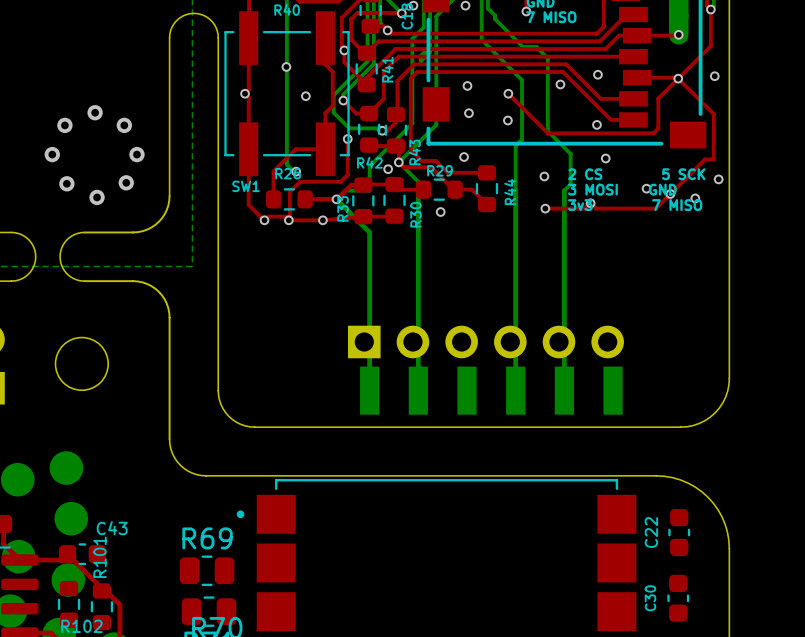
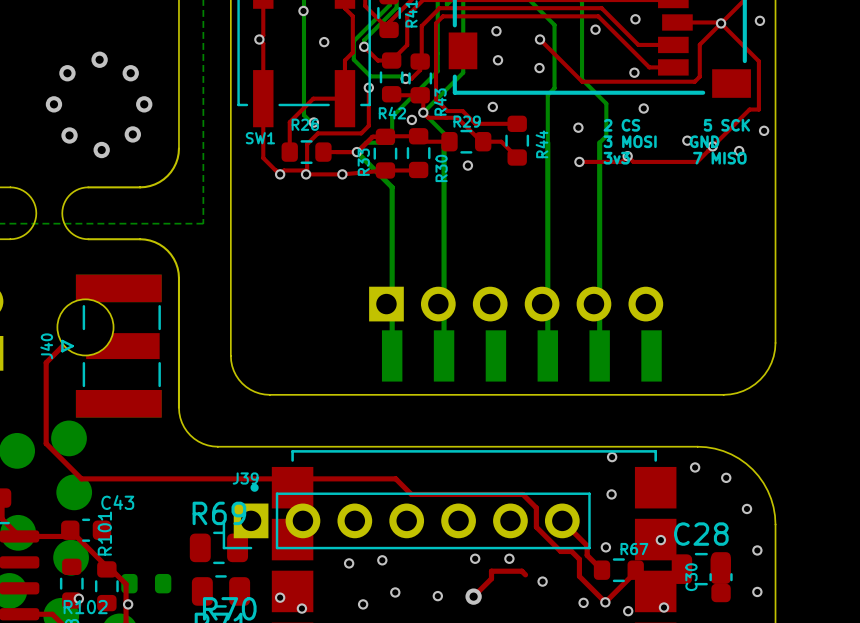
J40: none -> (111, 346)
top track: none -> (122, 346) (62, 346) (46, 362) (46, 443) (81, 478) (395, 478) (411, 494) (522, 494) (536, 507) (536, 527) (560, 551) (571, 551) (579, 559) (579, 576) (605, 602) (635, 570)
via: none -> (612, 457)
via: none -> (695, 467)
via: none -> (726, 477)
via: none -> (611, 494)
C22: (679, 532) -> none
via: none -> (746, 508)
J39: none -> (406, 520)
top track: none -> (562, 520) (587, 545) (587, 555) (602, 570)
via: none -> (660, 540)
via: none -> (605, 547)
via: none -> (757, 550)
via: none -> (475, 558)
via: none -> (509, 558)
via: none -> (382, 560)
via: none -> (349, 563)
C28: none -> (701, 569)
R67: none -> (618, 570)
top track: none -> (525, 574) (521, 571) (491, 571) (491, 578) (473, 596)
via: none -> (542, 581)
part: none -> (146, 583)
via: none -> (395, 592)
via: none -> (757, 591)
via: none -> (437, 596)
via: none -> (473, 596)
via: none -> (280, 597)
via: none -> (78, 598)
via: none -> (605, 602)
via: none -> (583, 602)
via: none -> (128, 604)
via: none -> (363, 604)
via: none -> (663, 607)
via: none -> (301, 608)
via: none -> (628, 611)

